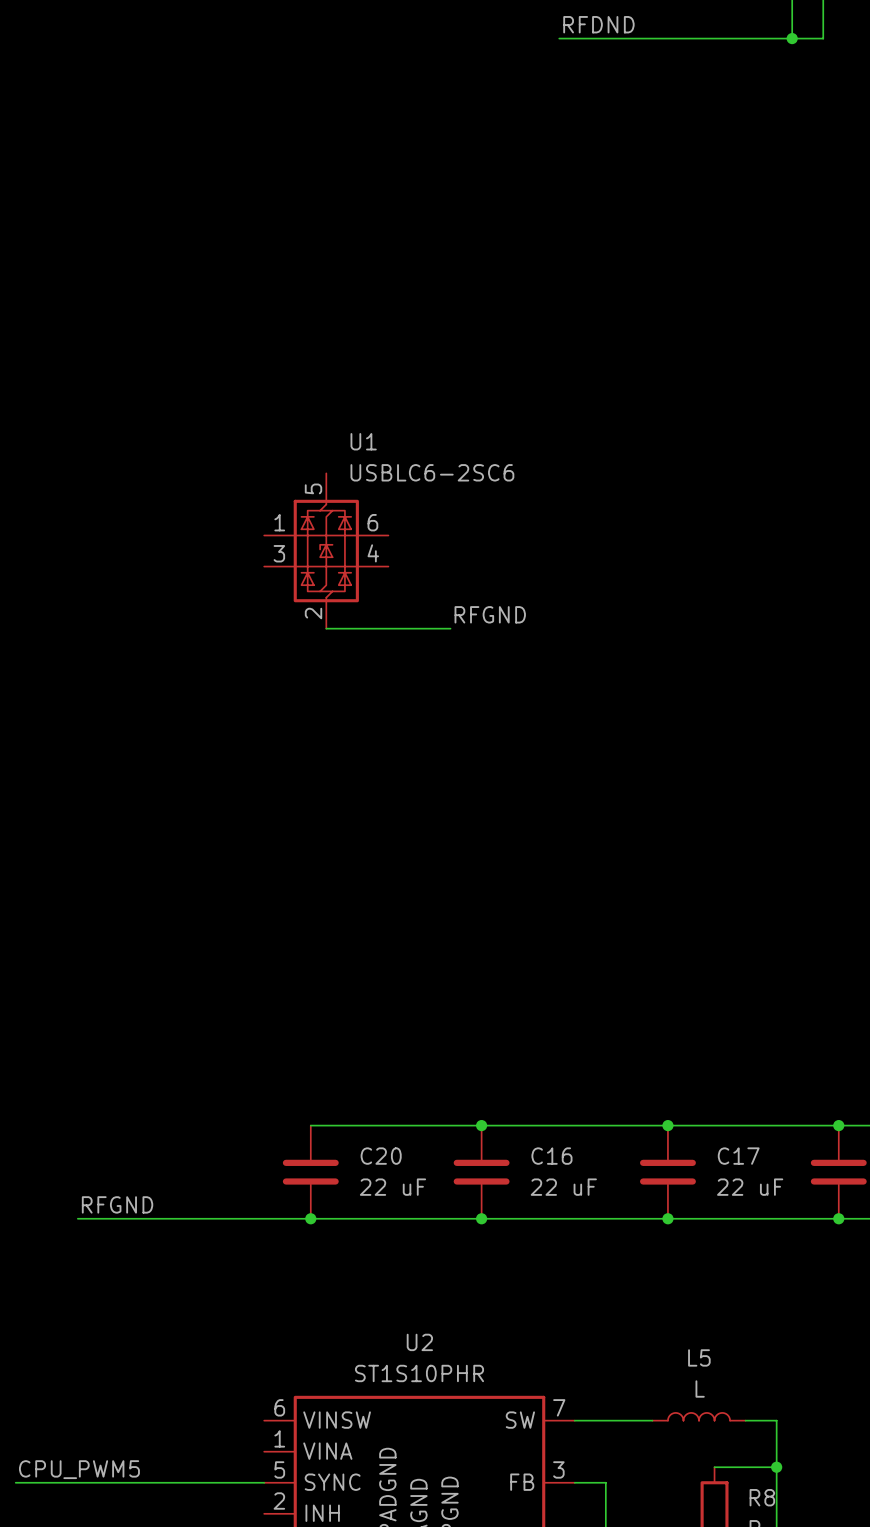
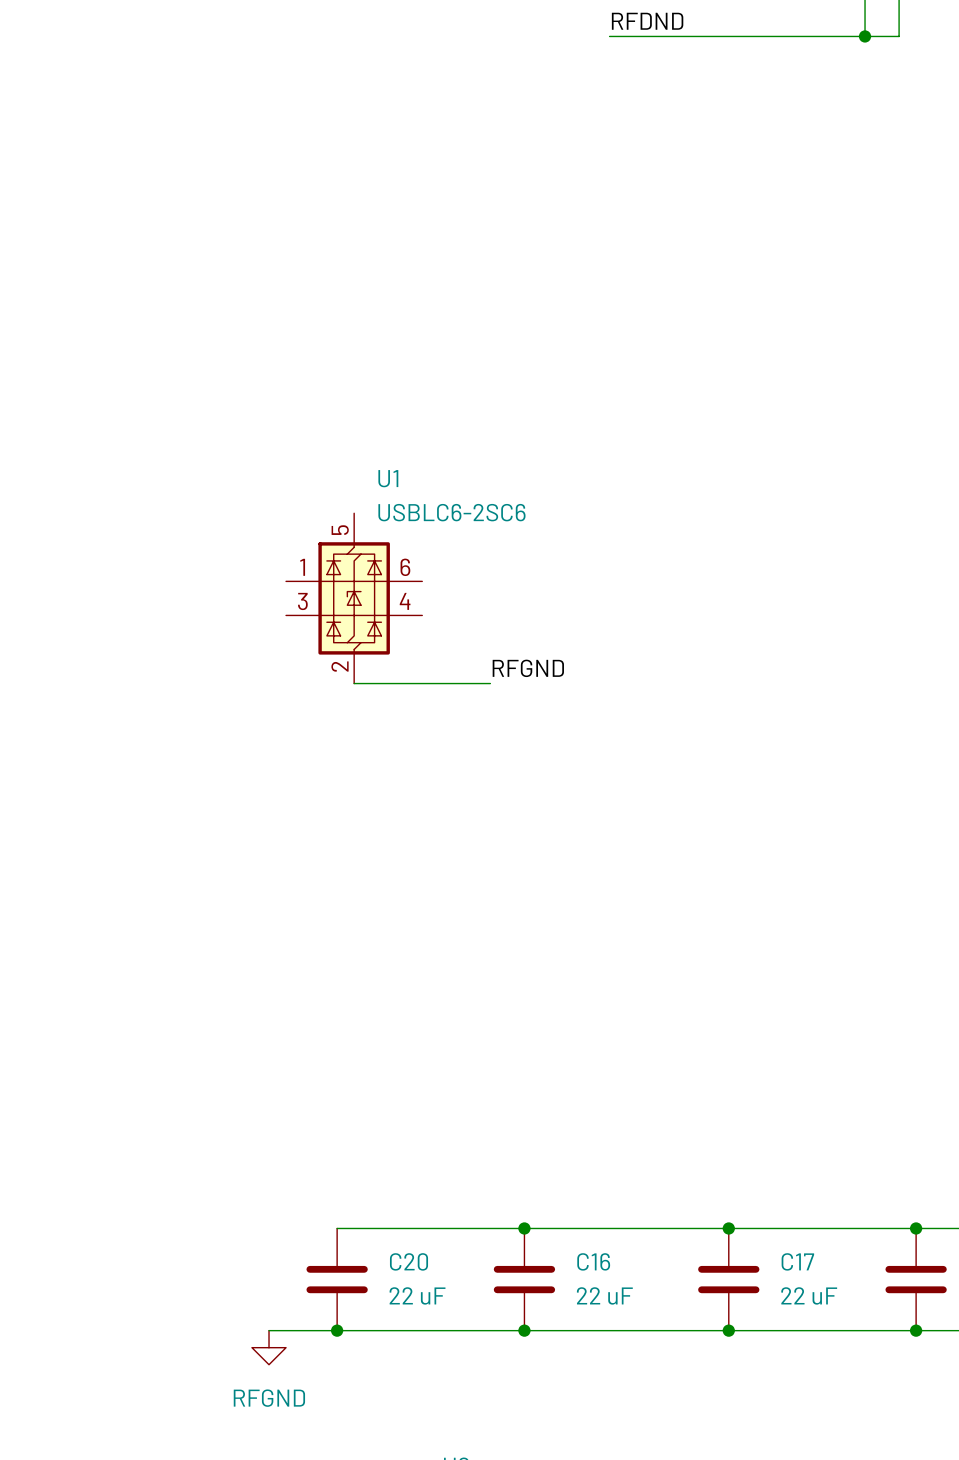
label: RFGND (117, 1204) -> none
wire: (77, 1218) (248, 1218) -> none
power symbol: none -> RFGND (269, 1347)

